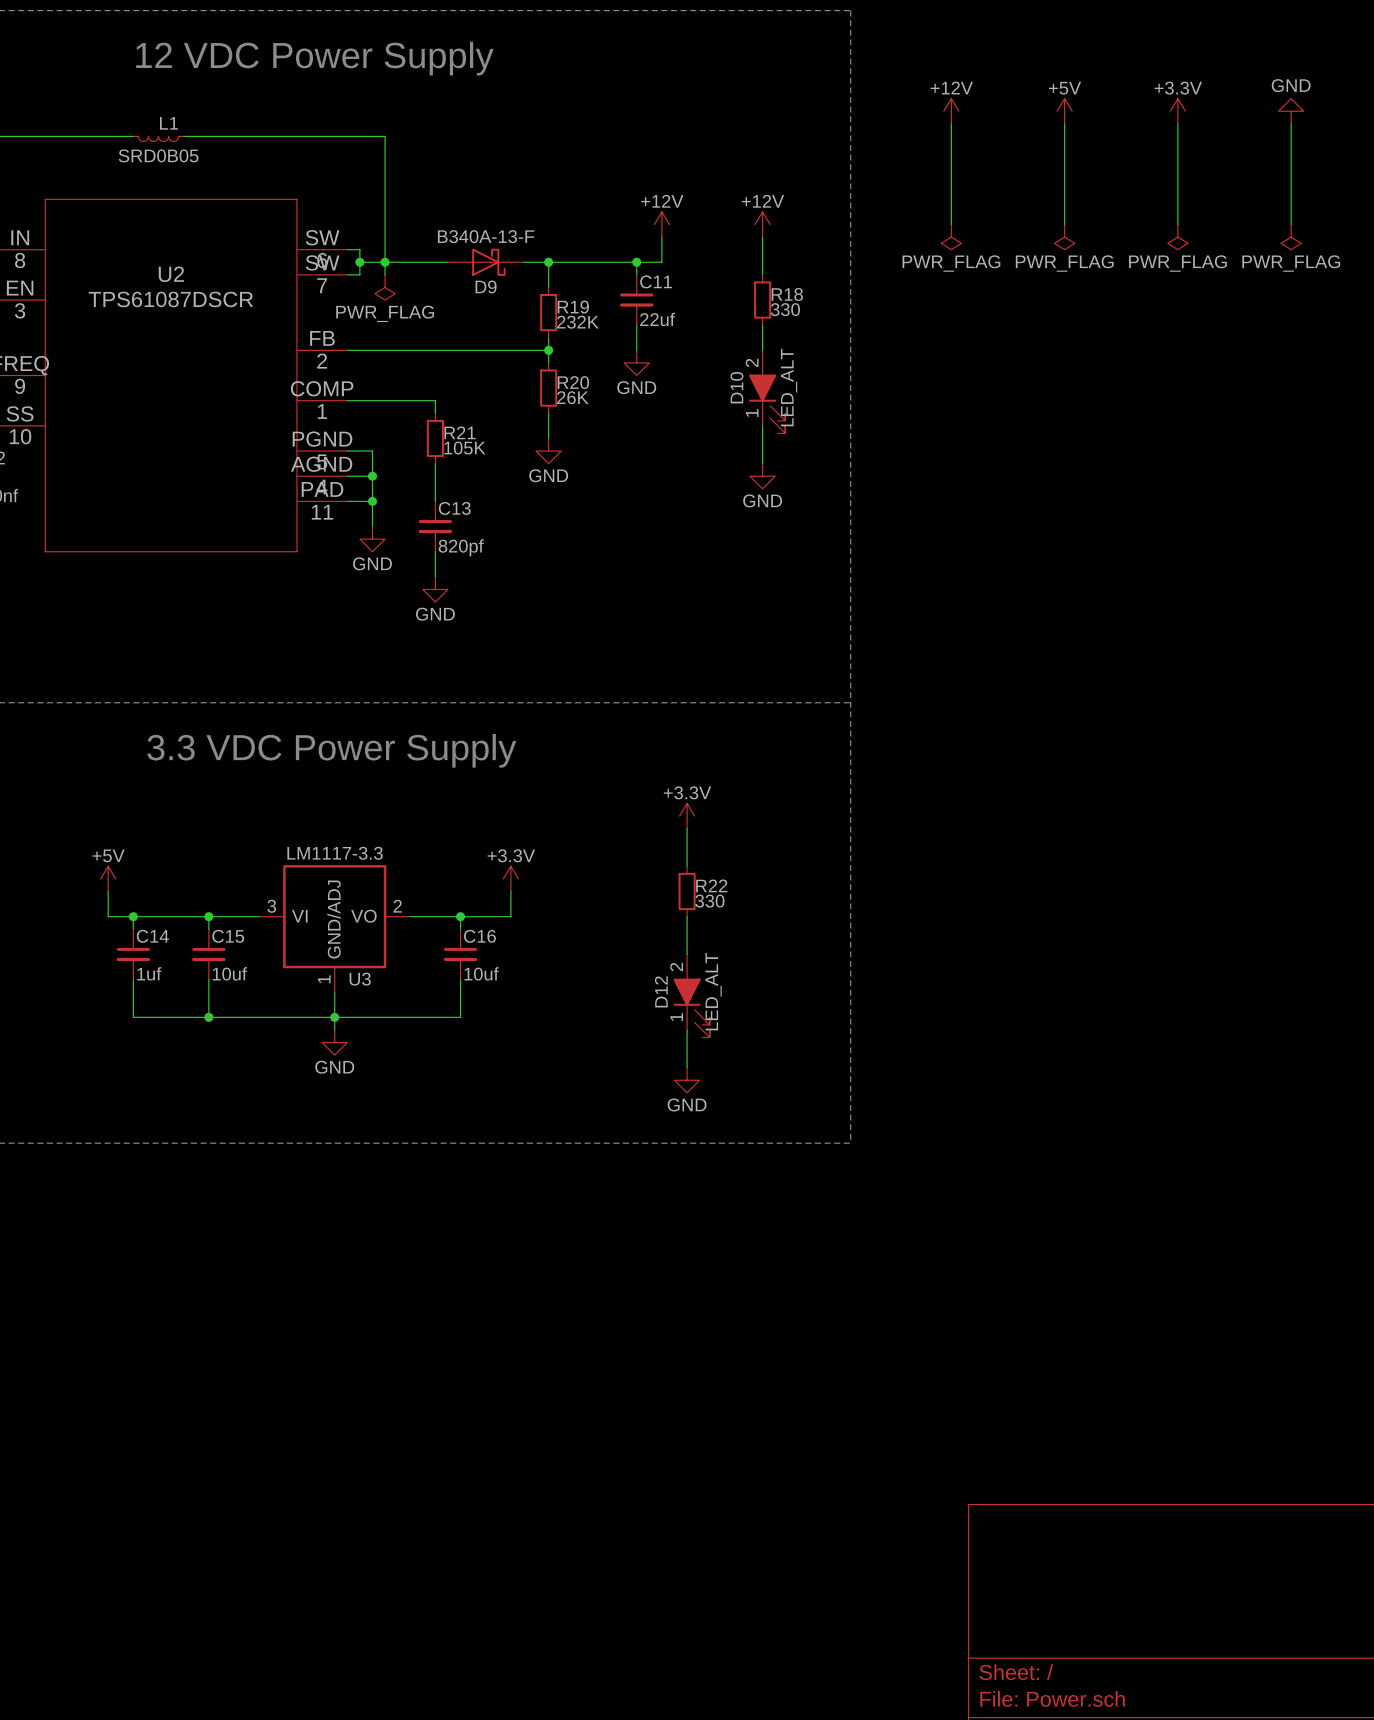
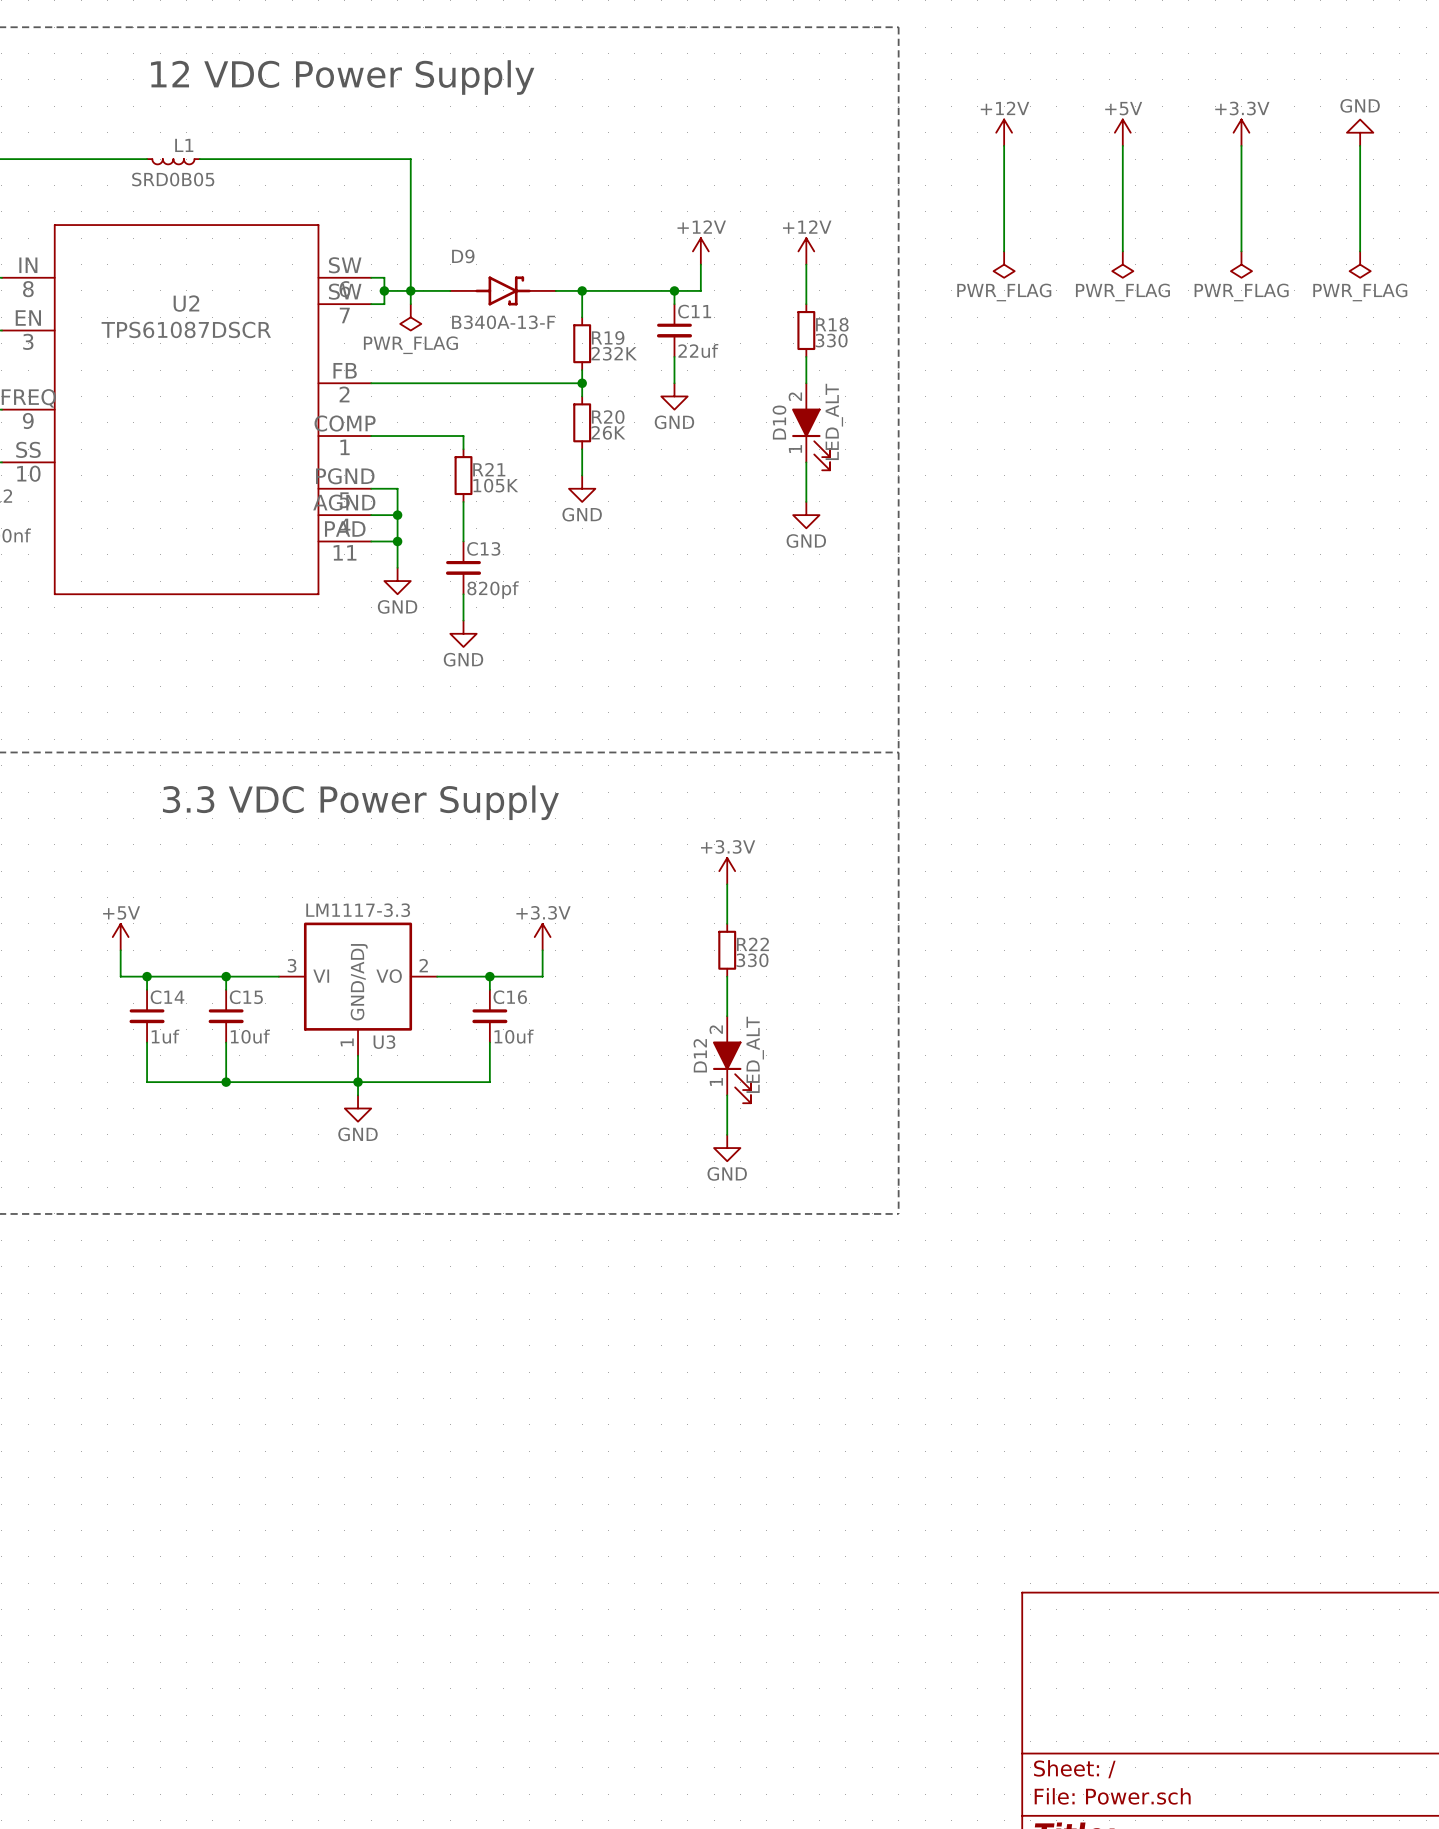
D9 value position: B340A-13-F (486, 236) -> B340A-13-F (503, 322)
D9 symbol: [447, 248, 524, 276] -> [450, 276, 556, 306]
D9 name position: D9 (486, 286) -> D9 (463, 256)

